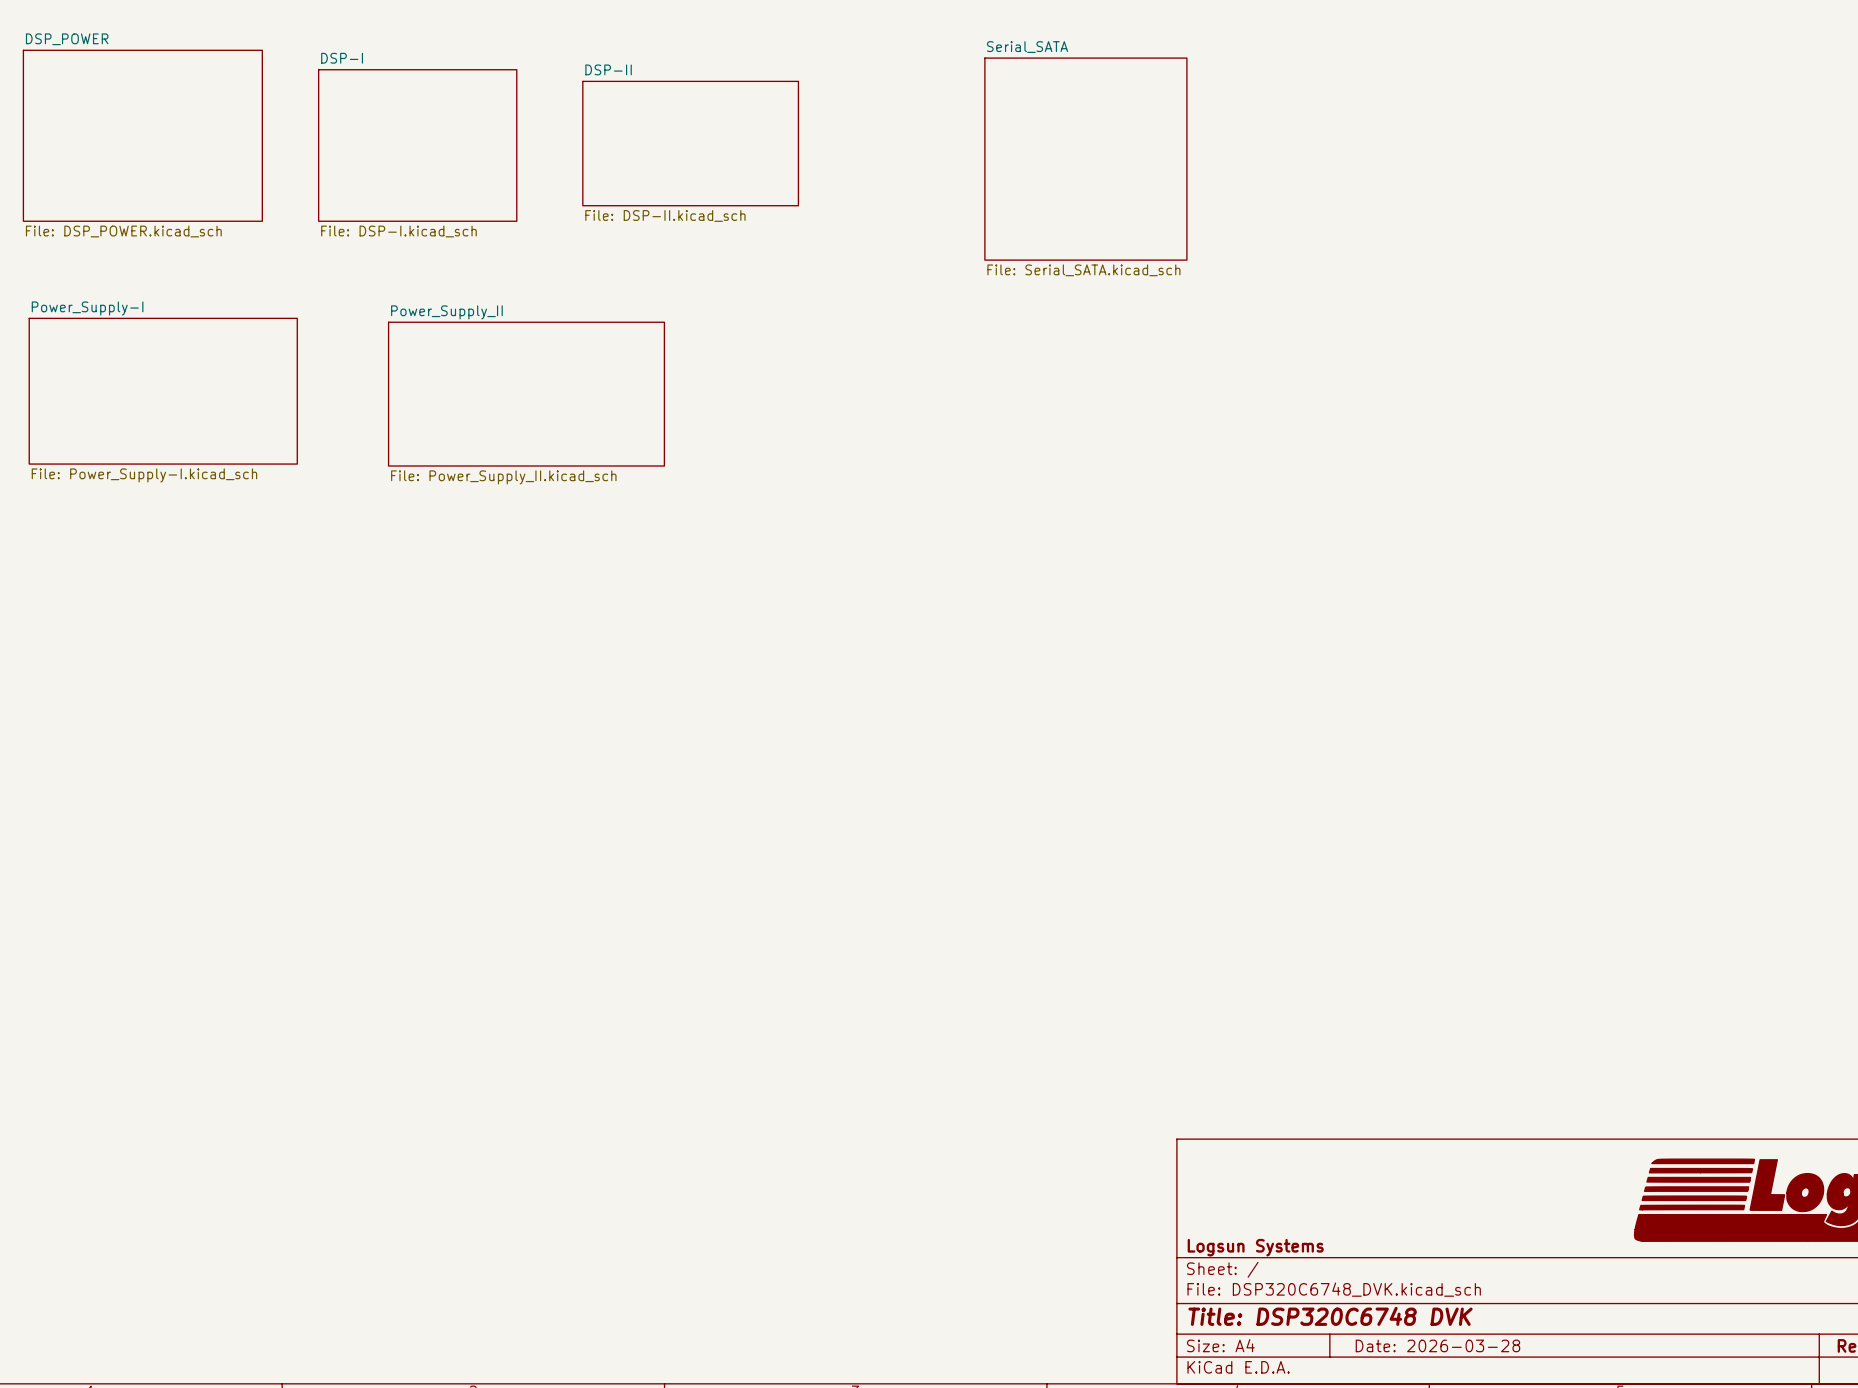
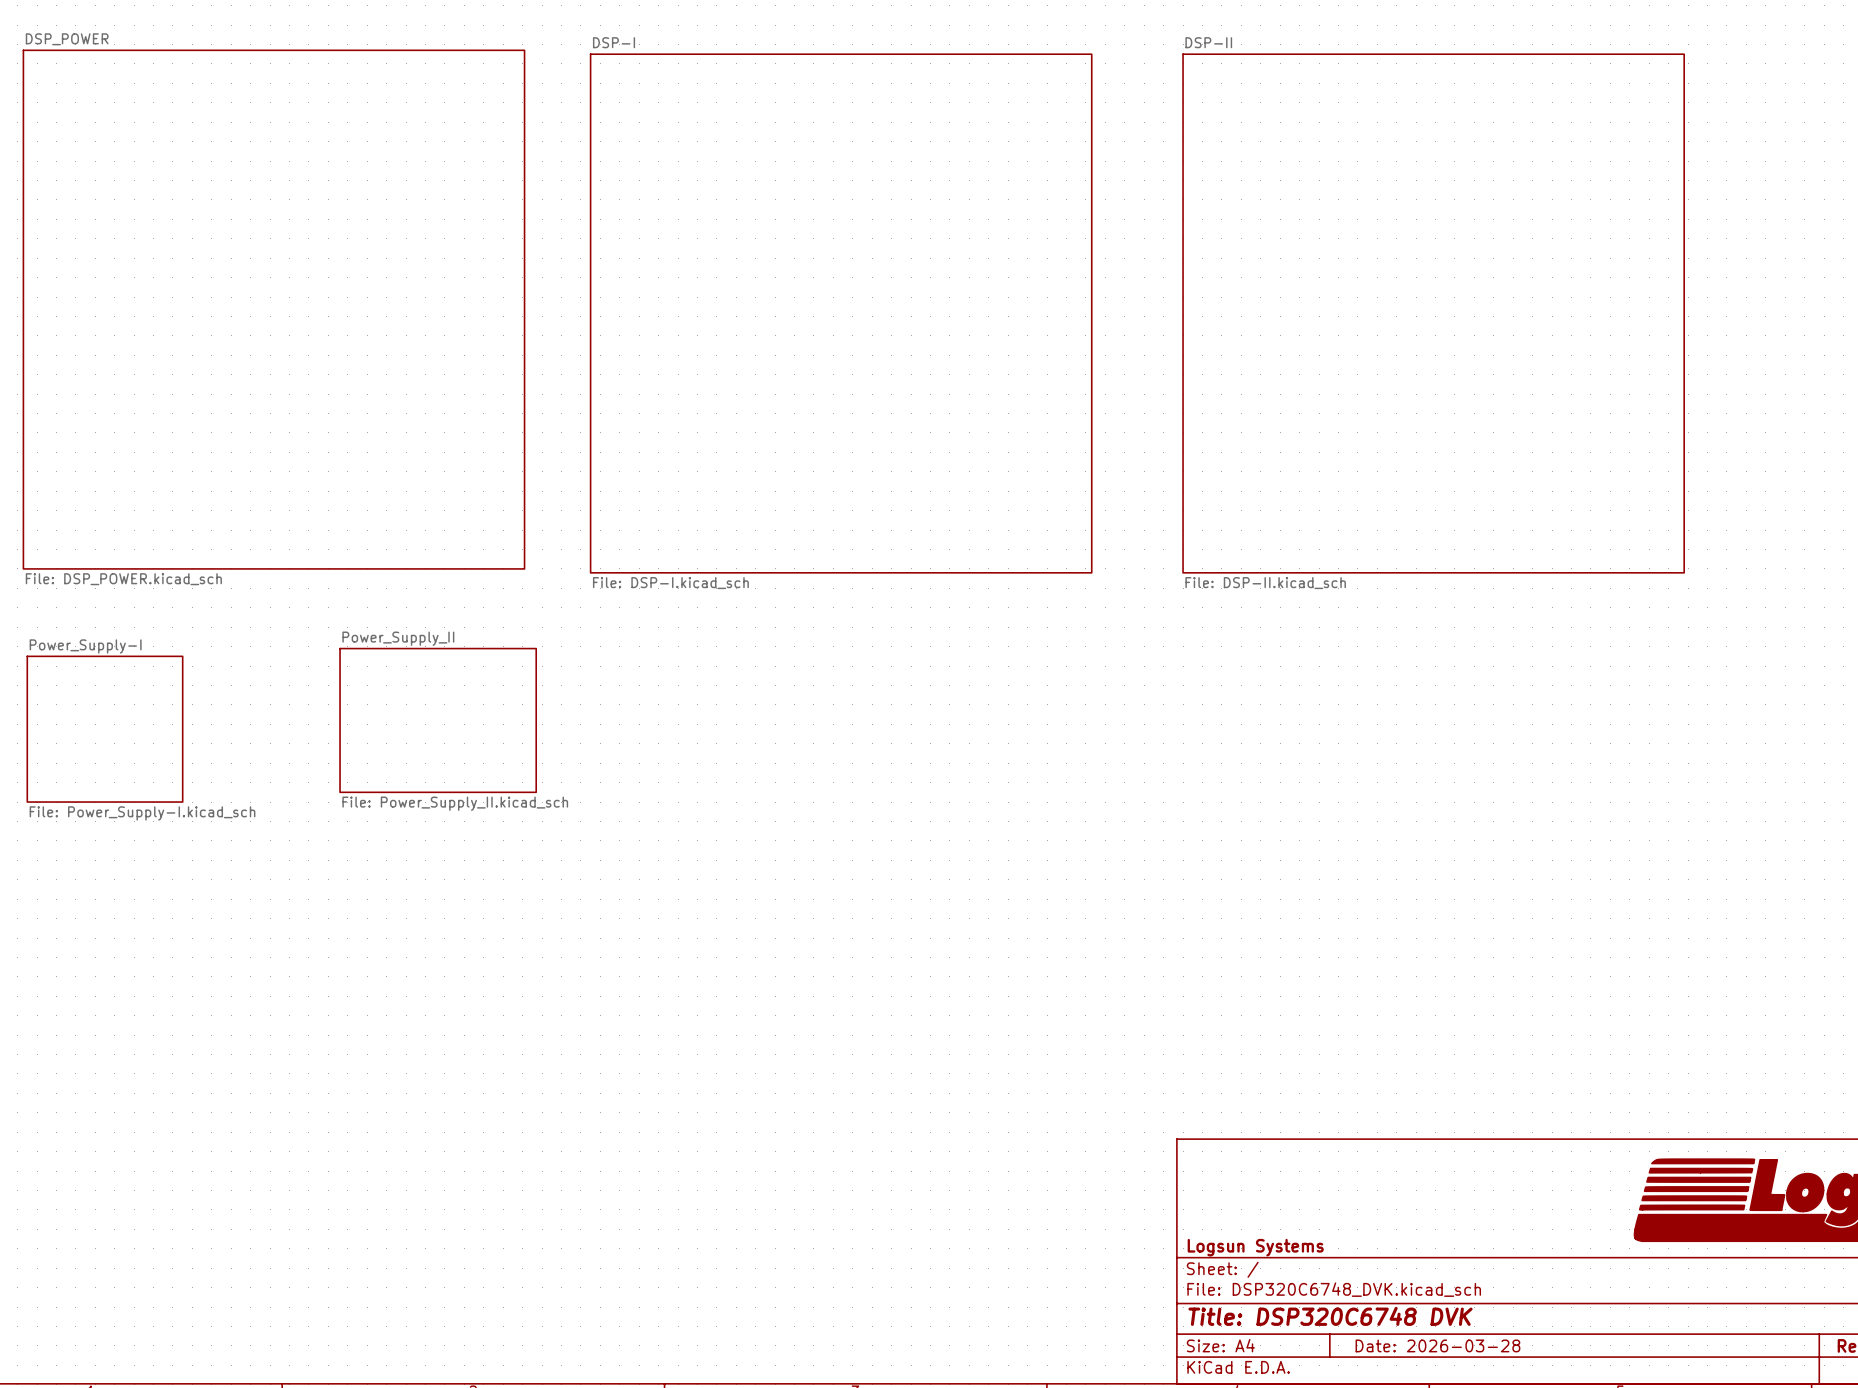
sheet DSP_POWER: File: DSP_POWER.kicad_sch (142, 135) -> none
sheet DSP-II: File: DSP-II.kicad_sch (690, 143) -> none
sheet DSP-I: File: DSP-I.kicad_sch (417, 145) -> none
sheet Serial_SATA: File: Serial_SATA.kicad_sch (1085, 159) -> none
sheet DSP_POWER: none -> File: DSP_POWER.kicad_sch (273, 309)
sheet DSP-I: none -> File: DSP-I.kicad_sch (841, 313)
sheet DSP-II: none -> File: DSP-II.kicad_sch (1433, 313)
sheet Power_Supply-I: File: Power_Supply-I.kicad_sch (163, 391) -> none
sheet Power_Supply_II: File: Power_Supply_II.kicad_sch (526, 394) -> none
sheet Power_Supply_II: none -> File: Power_Supply_II.kicad_sch (438, 720)
sheet Power_Supply-I: none -> File: Power_Supply-I.kicad_sch (104, 729)

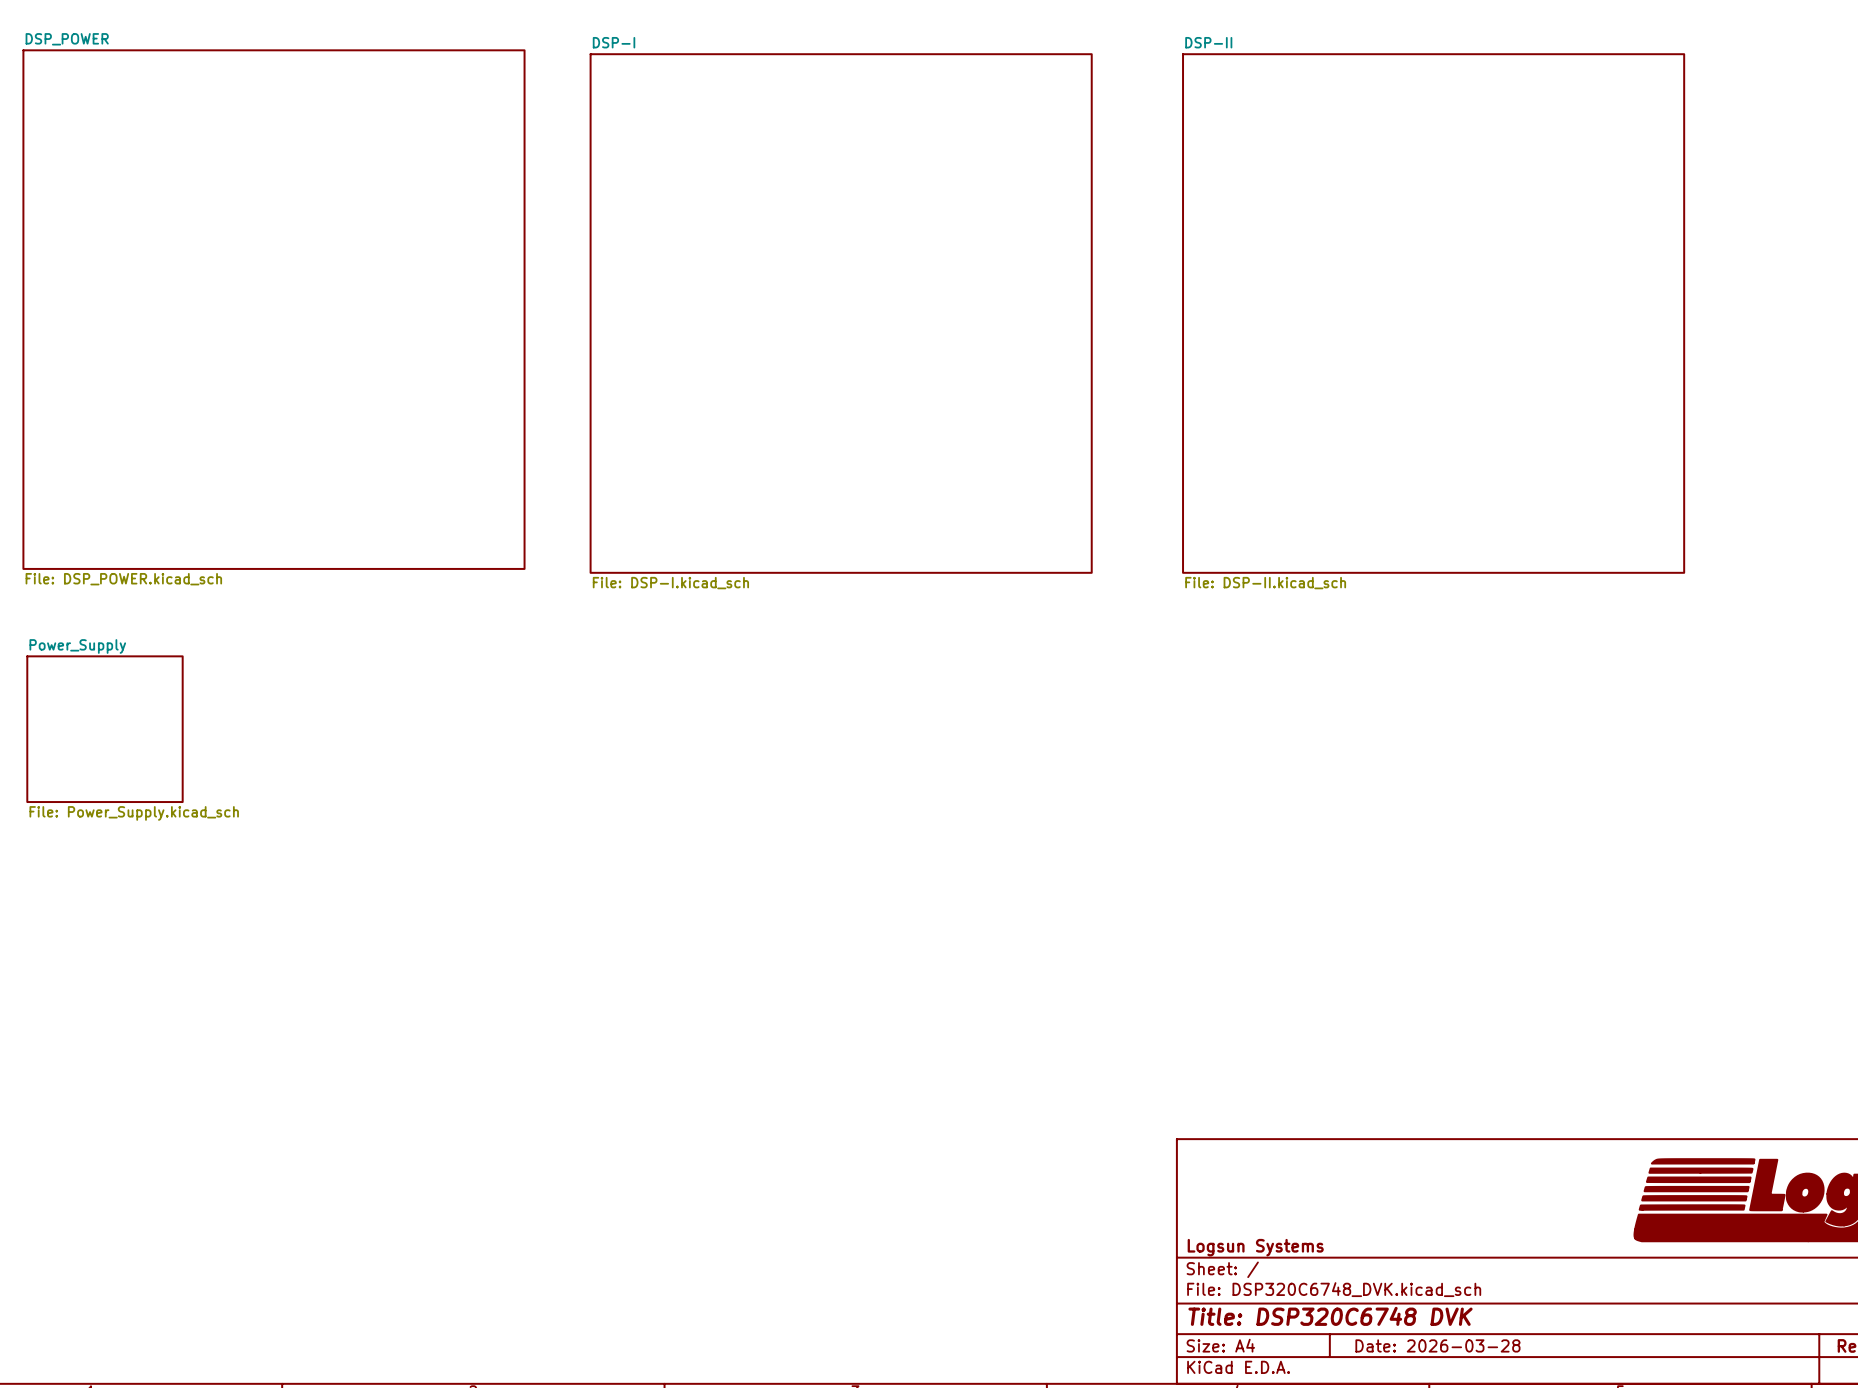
sheet Power_Supply-I name: Power_Supply-I (85, 646) -> Power_Supply (77, 646)
sheet Power_Supply_II: File: Power_Supply_II.kicad_sch (438, 720) -> none
sheet Power_Supply-I value: File: Power_Supply-I.kicad_sch (142, 813) -> File: Power_Supply.kicad_sch (134, 813)

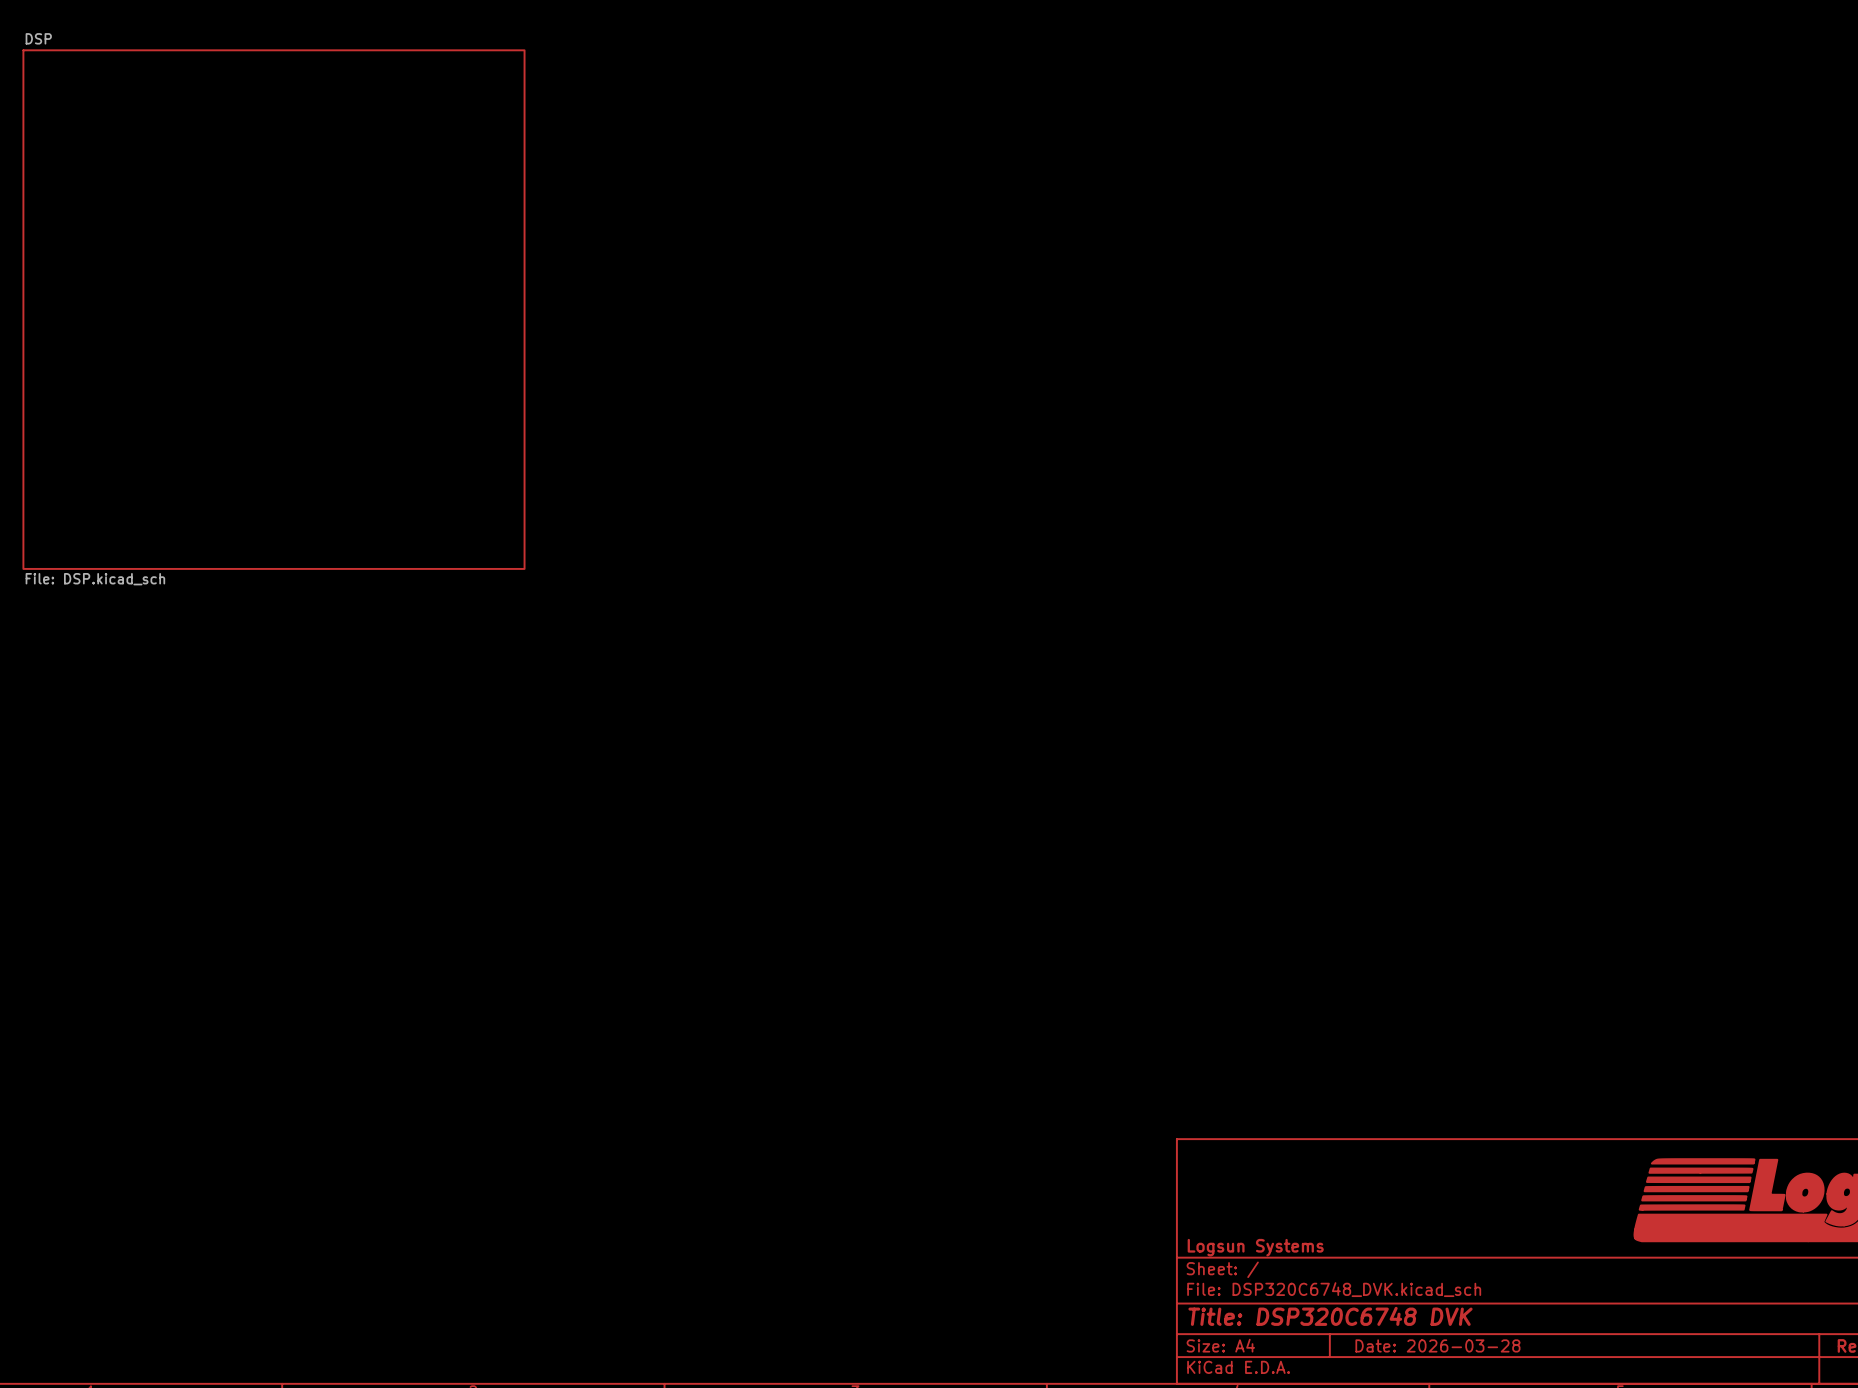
sheet DSP_POWER name: DSP_POWER (67, 39) -> DSP (38, 38)
sheet DSP-I: File: DSP-I.kicad_sch (841, 313) -> none
sheet DSP-II: File: DSP-II.kicad_sch (1433, 313) -> none
sheet DSP_POWER value: File: DSP_POWER.kicad_sch (123, 579) -> File: DSP.kicad_sch (95, 579)
sheet Power_Supply: File: Power_Supply.kicad_sch (104, 729) -> none

